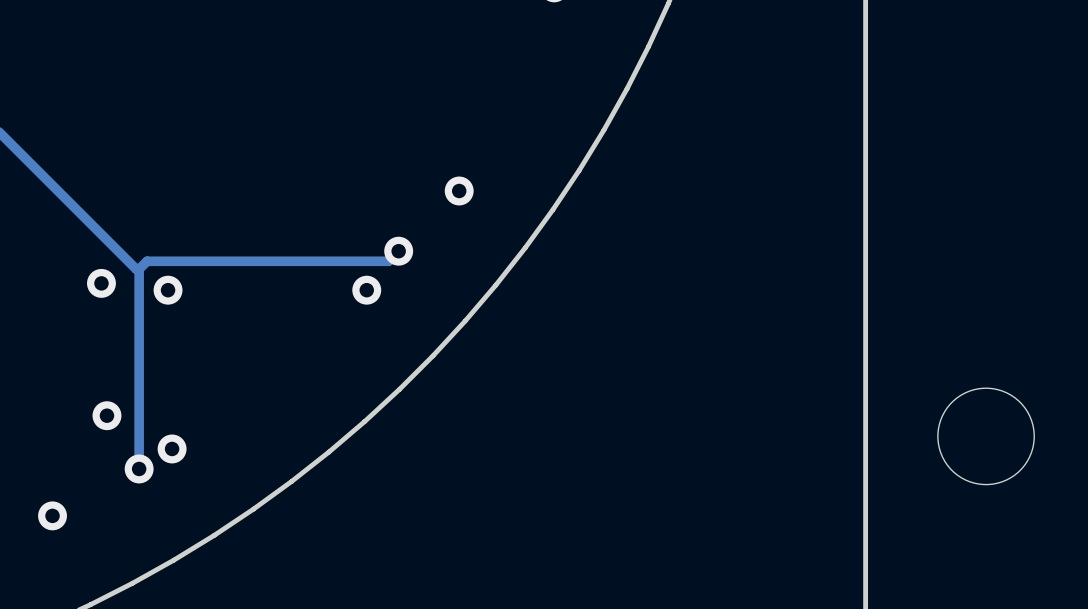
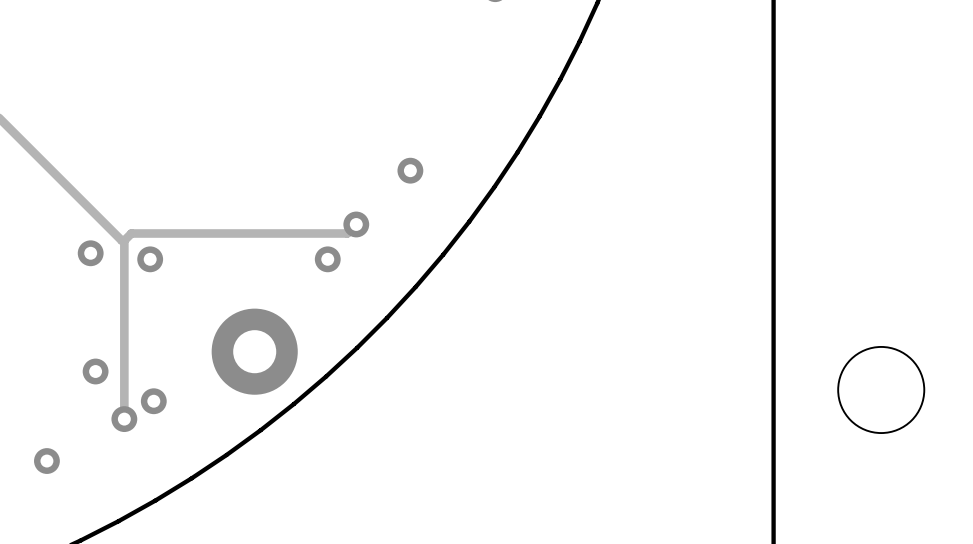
part: none -> (254, 351)

